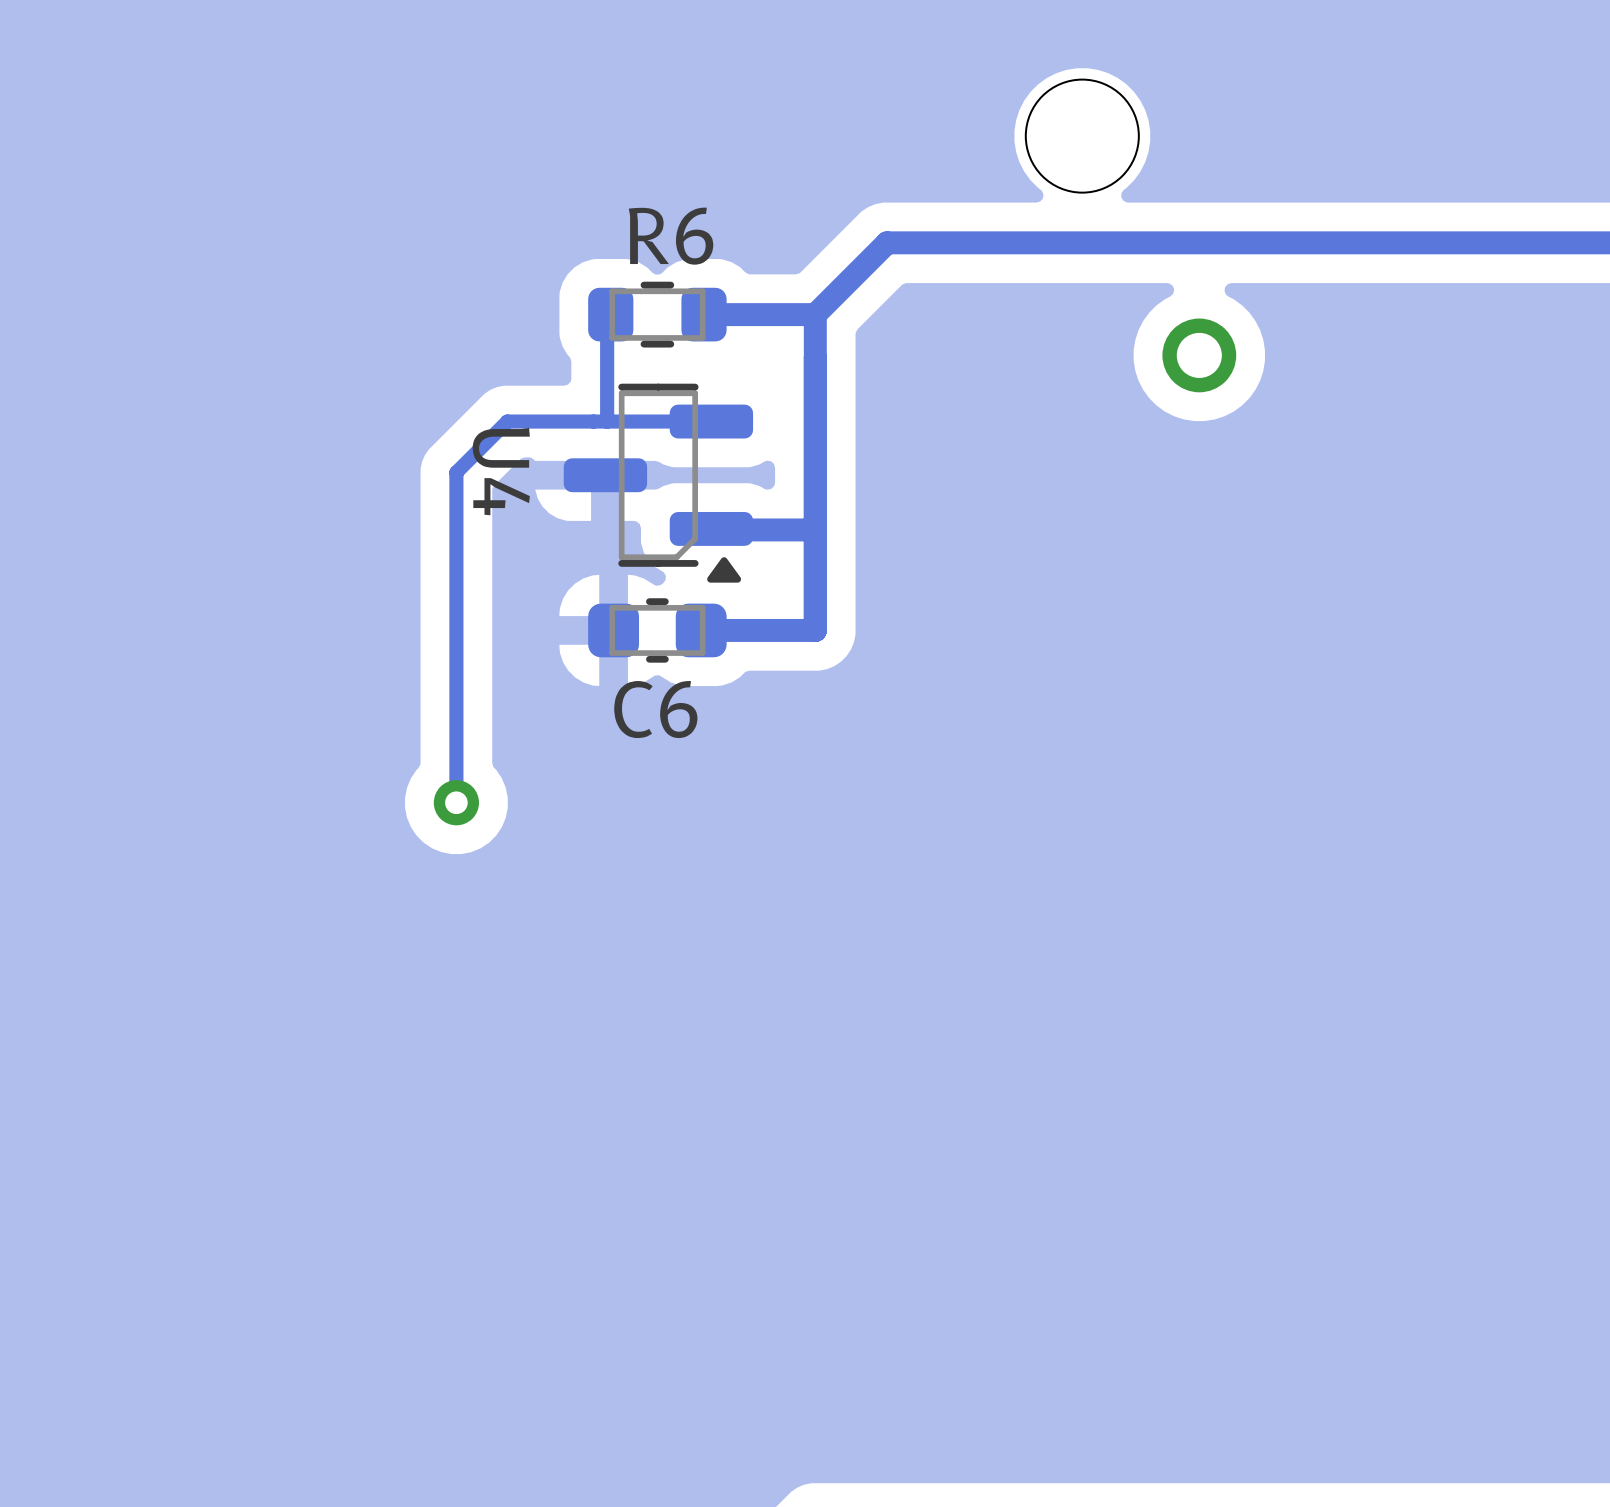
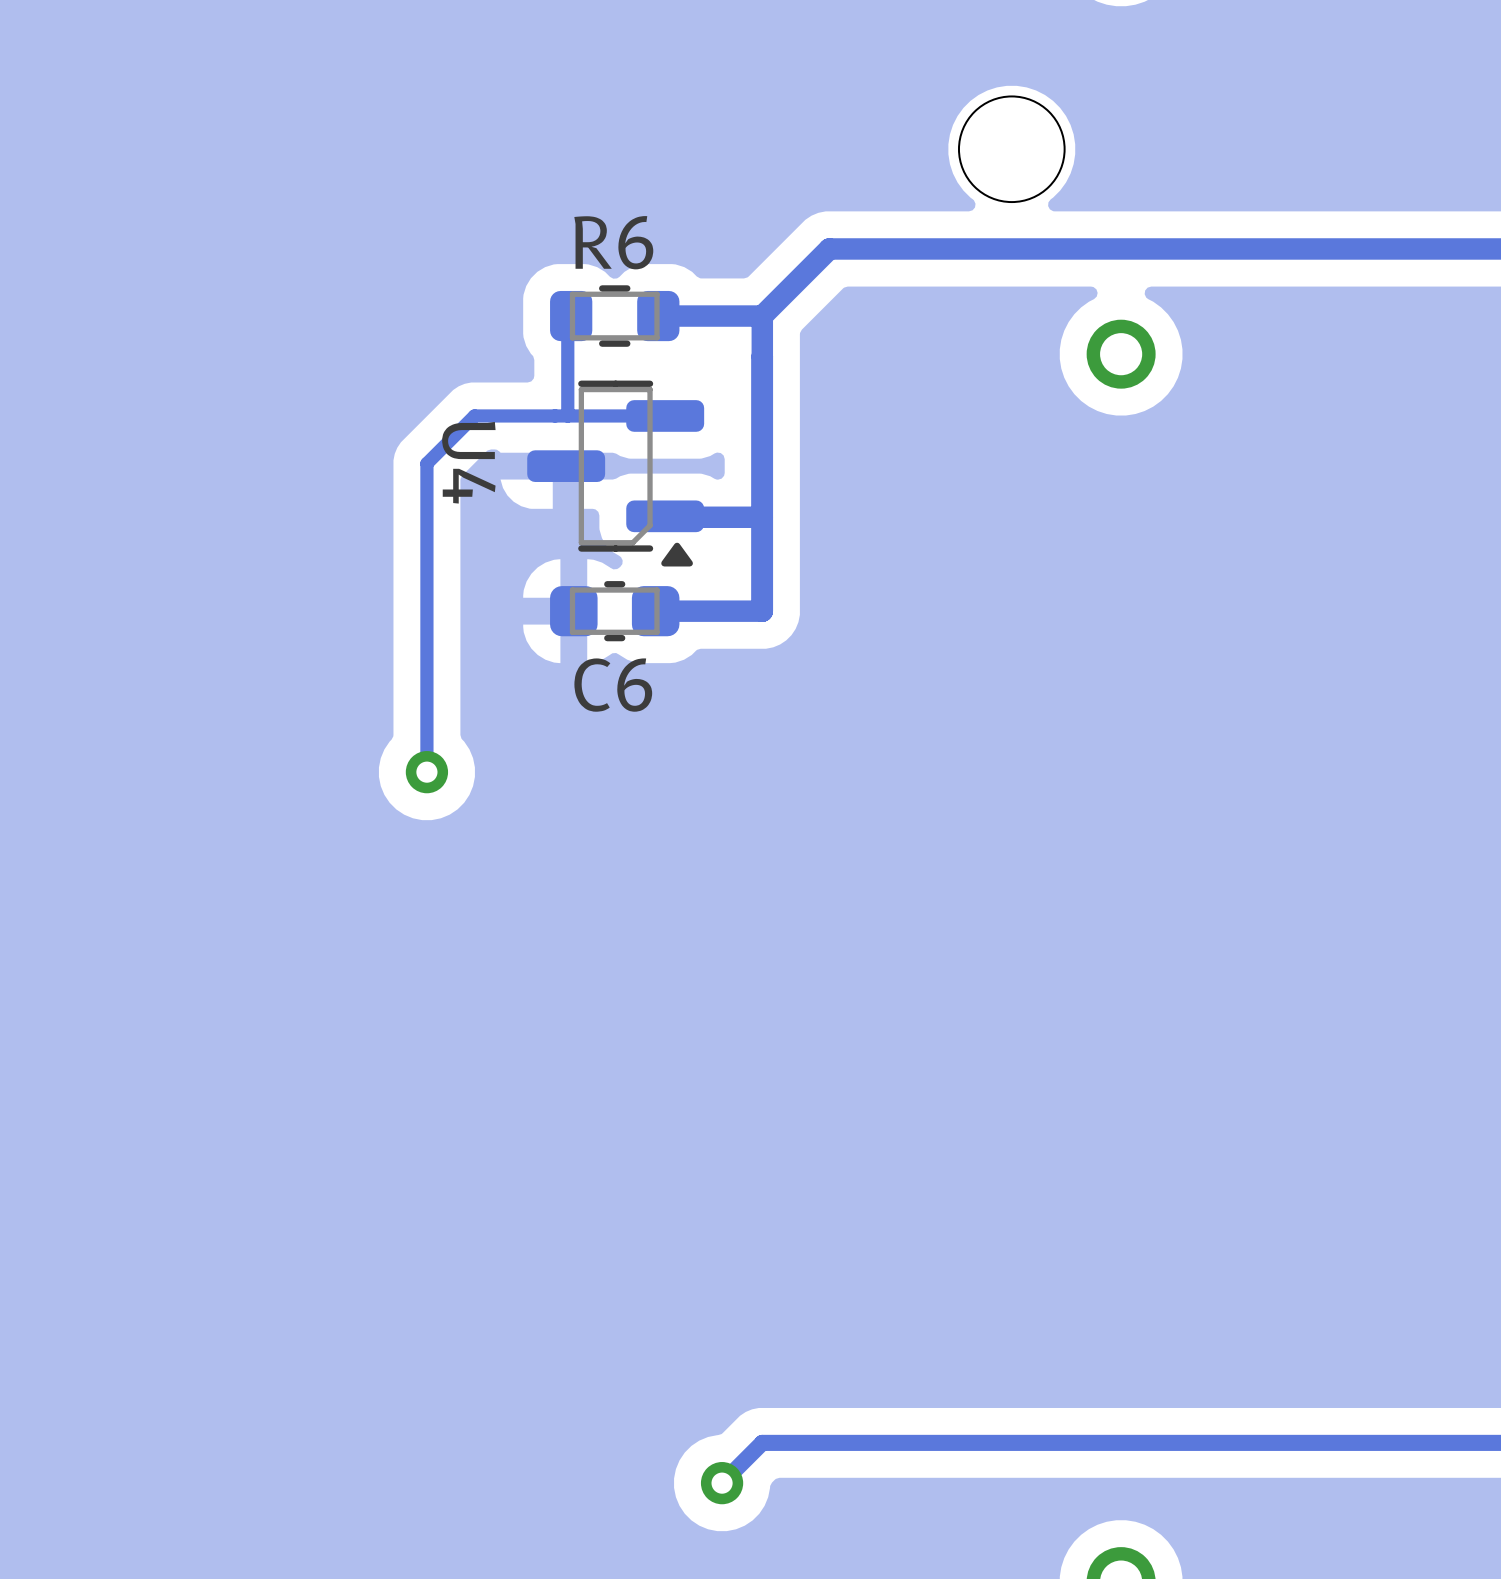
R6 name position: R6 (671, 236) -> R6 (613, 242)

